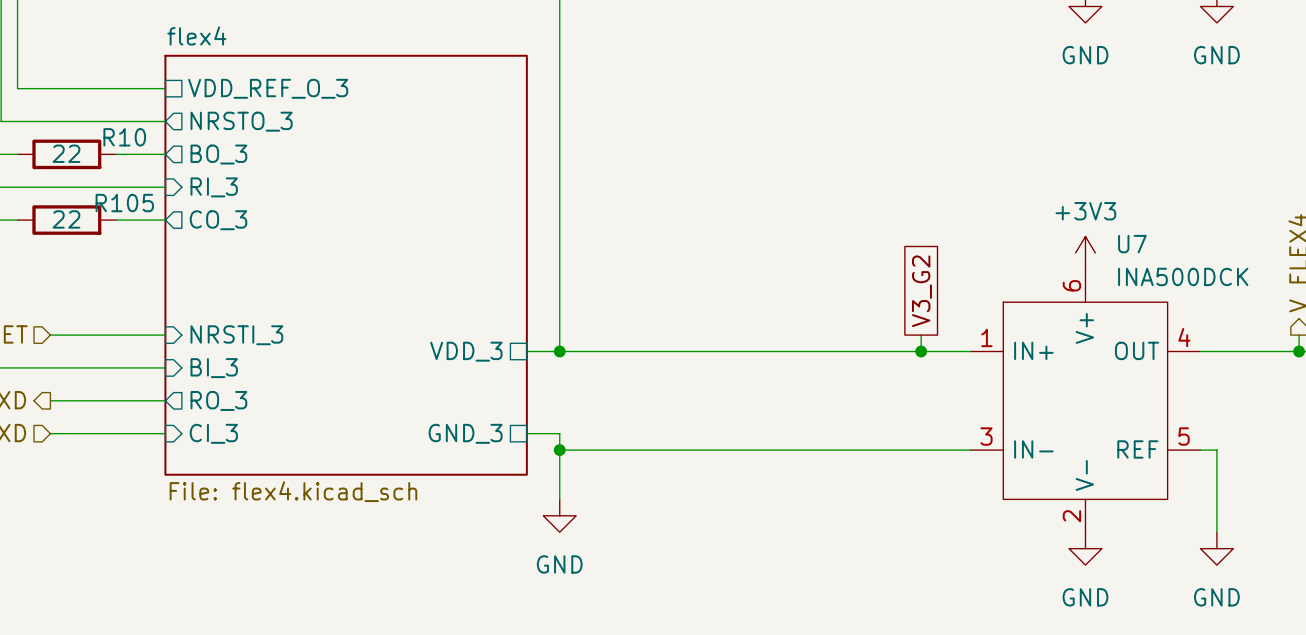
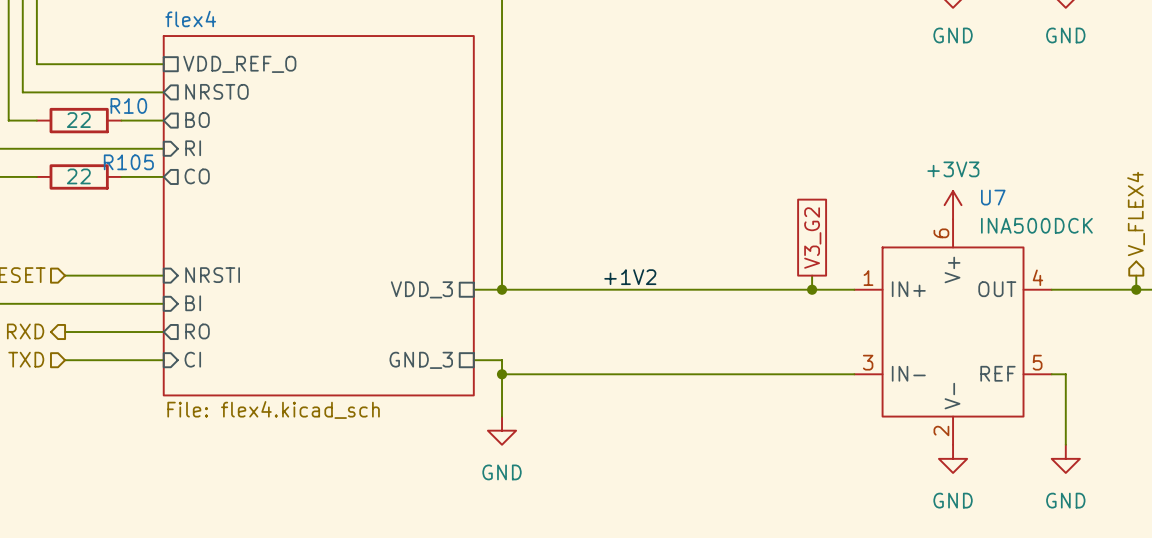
sheet pin: VDD_REF_O_3 (268, 88) -> VDD_REF_O (239, 64)
sheet pin: NRSTO_3 (241, 121) -> NRSTO (216, 91)
sheet pin: BO_3 (218, 154) -> BO (197, 120)
sheet pin: RI_3 (214, 187) -> RI (193, 148)
sheet pin: CO_3 (218, 220) -> CO (197, 176)
sheet pin: NRSTI_3 (236, 335) -> NRSTI (212, 275)
label: none -> +1V2 (630, 277)
sheet pin: BI_3 (214, 368) -> BI (193, 303)
sheet pin: RO_3 (218, 400) -> RO (197, 331)
sheet pin: CI_3 (213, 433) -> CI (192, 359)

